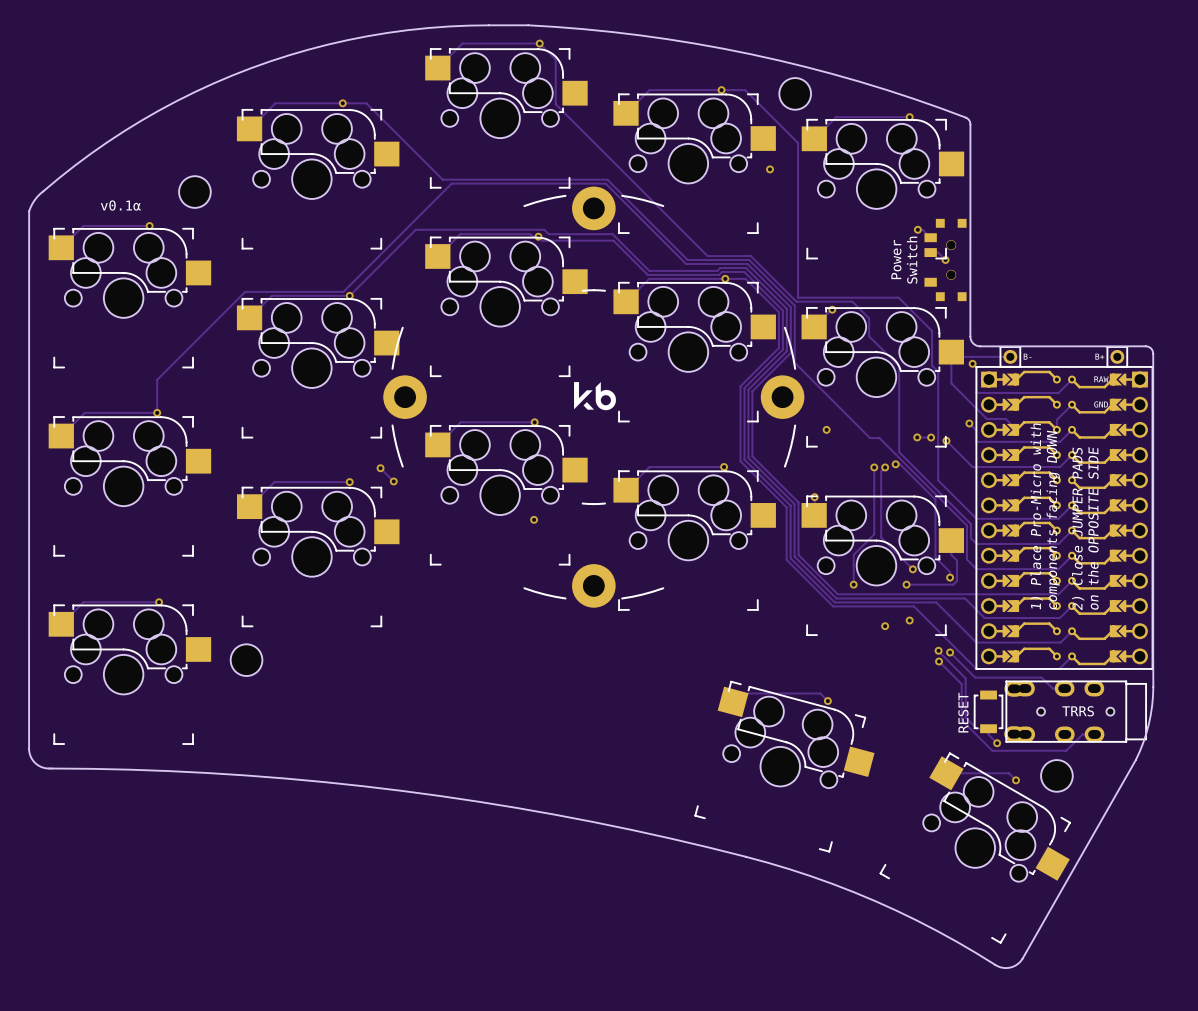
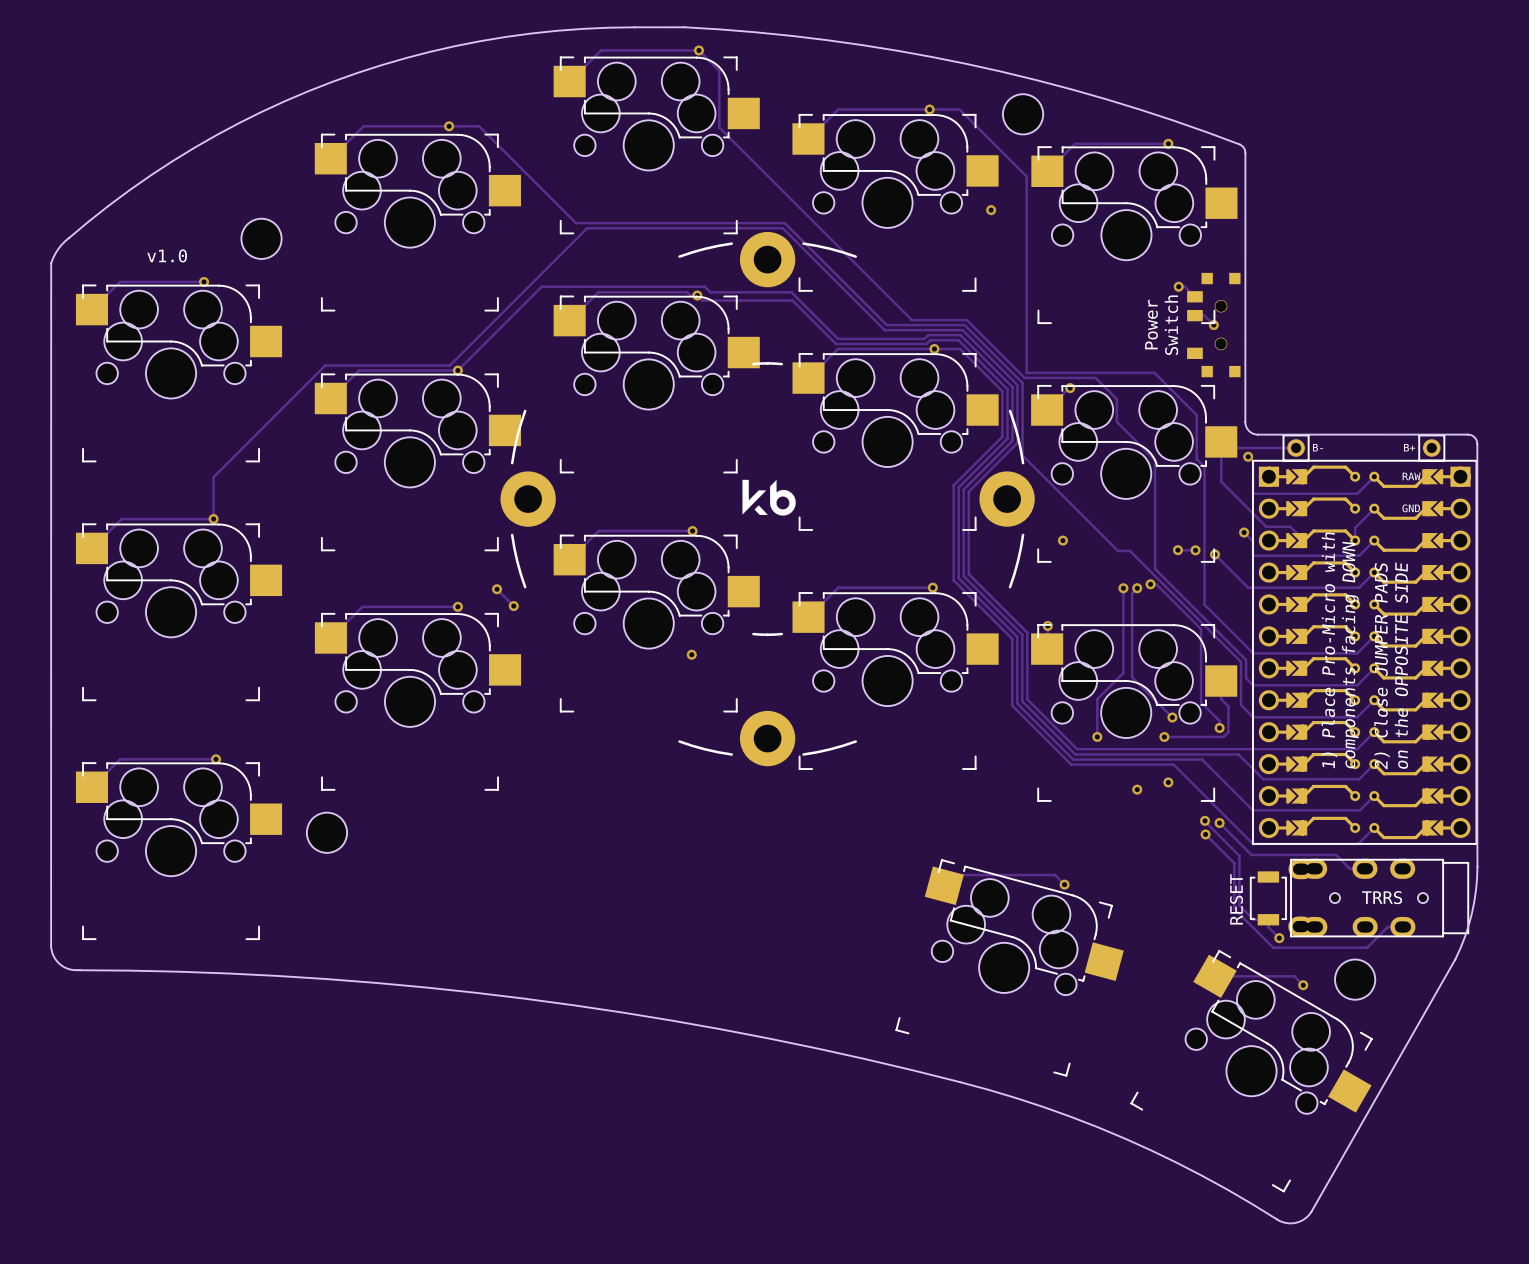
text: v0.1α (120, 205) -> v1.0 (167, 255)

